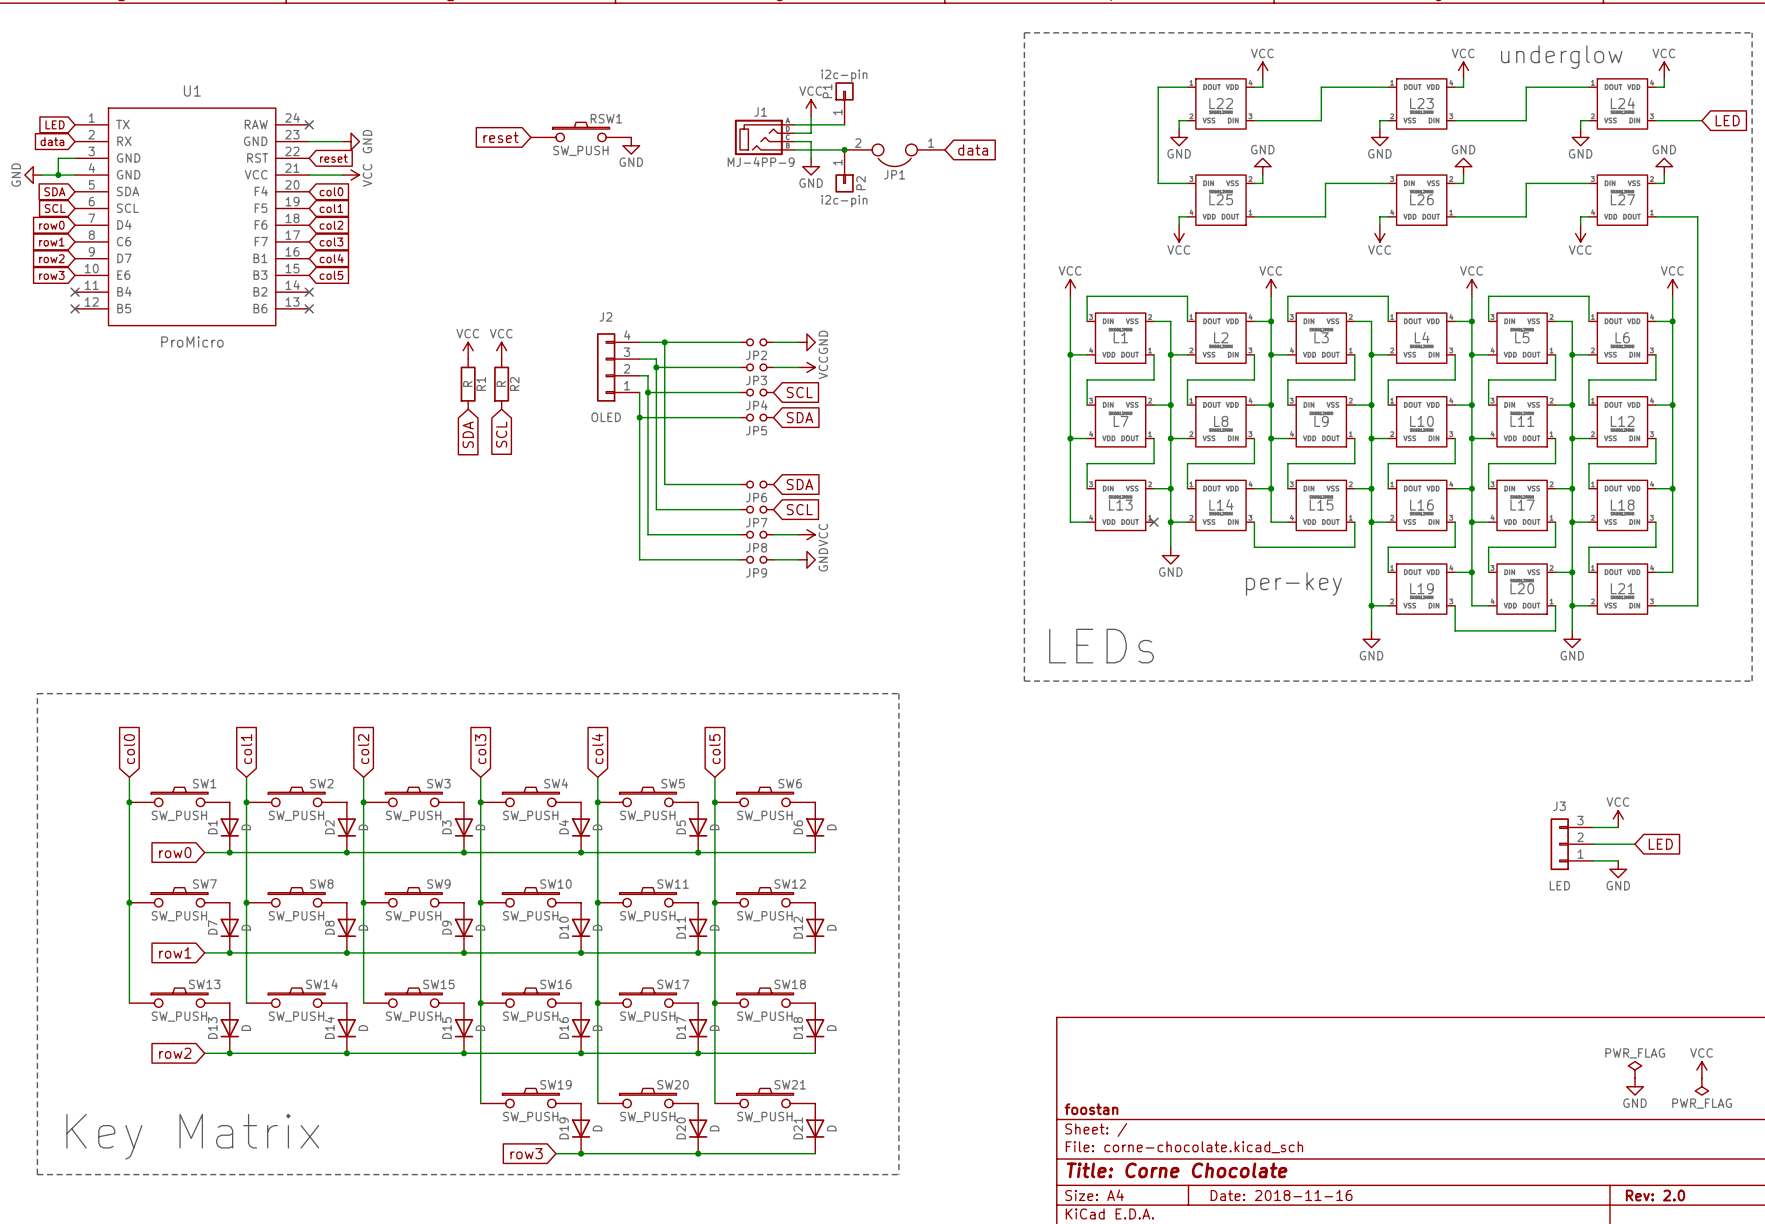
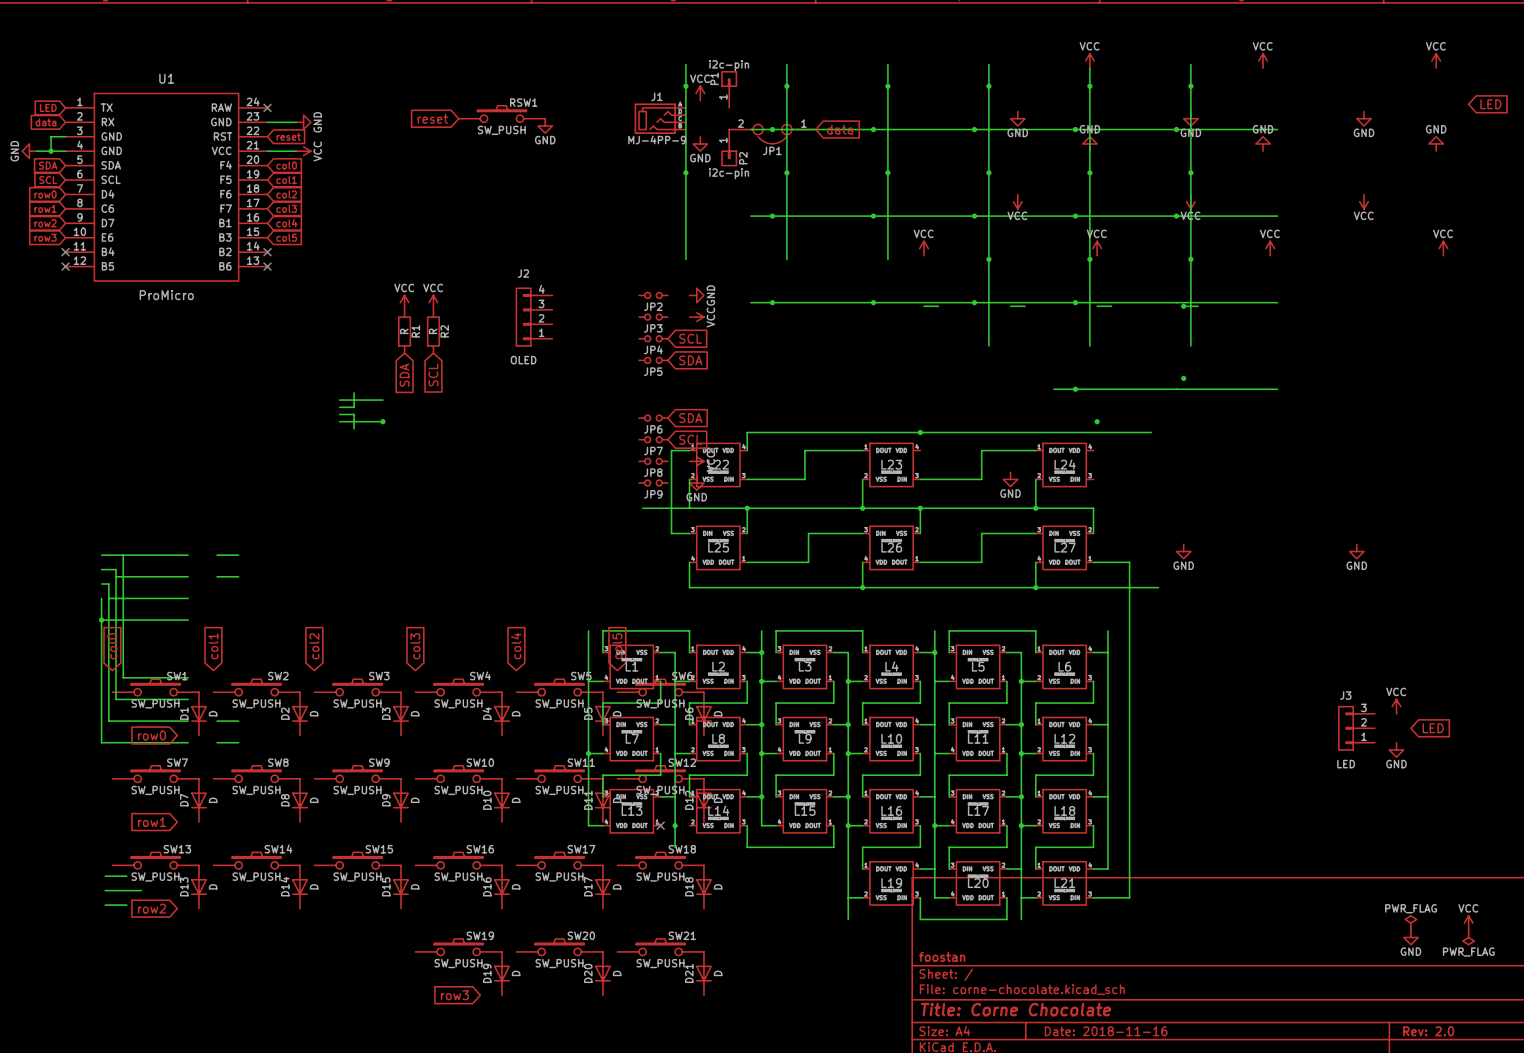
line: (1024, 32) (1752, 32) (1752, 681) (1024, 681) (1024, 32) -> none
text: underglow (1561, 57) -> none
wire: none -> (685, 64) (685, 259)
wire: none -> (786, 64) (786, 259)
wire: none -> (887, 64) (887, 259)
wire: none -> (988, 64) (988, 345)
wire: (1463, 78) (1463, 87) (1455, 87) -> none
wire: (1664, 78) (1664, 87) (1655, 87) -> none
wire: (1187, 87) (1158, 87) (1158, 183) (1187, 183) -> none
wire: (1254, 87) (1262, 87) -> (1089, 151) (1089, 75)
wire: (1388, 87) (1321, 87) (1321, 120) (1254, 120) -> none
wire: (1588, 87) (1526, 87) (1526, 120) (1455, 120) -> none
junction: none -> (685, 86)
junction: none -> (786, 86)
junction: none -> (887, 86)
junction: none -> (988, 86)
junction: none -> (1089, 86)
junction: none -> (1190, 86)
L22 position: (1220, 103) -> (718, 464)
L23 position: (1421, 103) -> (891, 464)
L24 position: (1622, 103) -> (1064, 464)
wire: (811, 116) (811, 133) (794, 133) -> none
wire: (1187, 120) (1179, 120) (1179, 129) -> none
wire: (1379, 120) (1388, 120) -> (1190, 104) (1190, 64)
wire: (1588, 120) (1580, 120) (1580, 129) -> none
wire: (1655, 120) (1701, 120) -> none
wire: (794, 124) (844, 124) -> none
wire: (794, 141) (811, 141) (811, 158) -> none
wire: (794, 149) (844, 149) -> none
junction: (844, 149) -> none
wire: none -> (750, 129) (1277, 129)
junction: none -> (772, 129)
junction: none -> (873, 129)
junction: none -> (974, 129)
junction: none -> (1075, 129)
junction: none -> (1176, 129)
wire: (1463, 175) (1463, 183) (1455, 183) -> none
wire: (1664, 175) (1664, 183) (1655, 183) -> none
wire: (1254, 183) (1262, 183) -> (1089, 345) (1089, 158)
wire: (1388, 183) (1325, 183) (1325, 216) (1254, 216) -> none
wire: (1588, 183) (1526, 183) (1526, 216) (1455, 216) -> none
junction: none -> (685, 172)
junction: none -> (786, 172)
junction: none -> (887, 172)
junction: none -> (988, 172)
L25 position: (1220, 200) -> (718, 547)
junction: none -> (1089, 172)
junction: none -> (1190, 172)
L26 position: (1421, 200) -> (891, 547)
L27 position: (1622, 200) -> (1064, 547)
wire: (1187, 216) (1179, 216) (1179, 225) -> none
wire: (1379, 216) (1388, 216) -> (1190, 187) (1190, 111)
wire: (1588, 216) (1580, 216) (1580, 225) -> none
wire: (1655, 216) (1697, 216) (1697, 605) (1655, 605) -> none
wire: none -> (1190, 194) (1190, 345)
wire: none -> (750, 216) (1277, 216)
junction: none -> (772, 216)
junction: none -> (873, 216)
junction: none -> (974, 216)
junction: none -> (1075, 216)
junction: none -> (1176, 216)
wire: (1070, 296) (1070, 522) (1087, 522) -> none
wire: (1271, 296) (1271, 522) (1287, 522) -> none
wire: (1471, 296) (1471, 605) (1488, 605) -> none
wire: (1672, 296) (1672, 572) (1655, 572) -> none
junction: none -> (988, 259)
junction: none -> (1089, 259)
junction: none -> (1190, 259)
wire: (1087, 321) (1087, 296) (1187, 296) (1187, 321) -> none
wire: (1154, 321) (1170, 321) (1170, 547) -> none
wire: (1254, 321) (1271, 321) -> none
junction: (1271, 321) -> none
wire: (1287, 321) (1287, 296) (1388, 296) (1388, 321) -> none
wire: (1354, 321) (1371, 321) (1371, 630) -> none
wire: (1455, 321) (1471, 321) -> none
junction: (1471, 321) -> none
wire: (1488, 321) (1488, 296) (1588, 296) (1588, 321) -> none
wire: (1555, 321) (1572, 321) (1572, 630) -> none
wire: (1655, 321) (1672, 321) -> none
junction: (1672, 321) -> none
L1 position: (1120, 338) -> (631, 666)
L2 position: (1220, 338) -> (718, 666)
L3 position: (1321, 338) -> (804, 666)
L4 position: (1421, 338) -> (891, 666)
L5 position: (1522, 338) -> (978, 666)
L6 position: (1622, 338) -> (1064, 666)
wire: (639, 342) (740, 342) -> none
wire: (664, 342) (664, 484) (740, 484) -> none
junction: (664, 342) -> none
wire: (773, 342) (798, 342) -> none
wire: none -> (750, 302) (1277, 302)
junction: none -> (772, 302)
junction: none -> (873, 302)
junction: none -> (974, 302)
junction: none -> (1075, 302)
junction: (1070, 354) -> none
wire: (1154, 354) (1154, 379) (1087, 379) (1087, 405) -> none
junction: (1170, 354) -> none
wire: (1254, 354) (1254, 379) (1187, 379) (1187, 405) -> none
junction: (1271, 354) -> none
wire: (1354, 354) (1354, 379) (1287, 379) (1287, 405) -> none
wire: (1455, 354) (1455, 379) (1388, 379) (1388, 405) -> none
wire: (1471, 354) (1488, 354) -> none
junction: (1471, 354) -> none
wire: (1555, 354) (1555, 379) (1488, 379) (1488, 405) -> none
wire: (1572, 354) (1588, 354) -> none
junction: (1572, 354) -> none
wire: (1655, 354) (1655, 379) (1588, 379) (1588, 405) -> none
wire: (639, 359) (656, 359) (656, 509) (740, 509) -> none
wire: (656, 367) (740, 367) -> none
junction: (656, 367) -> none
wire: (773, 367) (798, 367) -> none
wire: (639, 375) (648, 375) (648, 534) (740, 534) -> none
wire: (639, 392) (639, 559) (740, 559) -> none
wire: (648, 392) (740, 392) -> none
junction: (648, 392) -> none
wire: (1154, 405) (1170, 405) -> none
junction: (1170, 405) -> none
wire: (1254, 405) (1271, 405) -> none
junction: (1271, 405) -> none
wire: (1354, 405) (1371, 405) -> none
junction: (1371, 405) -> none
wire: (1455, 405) (1471, 405) -> none
junction: (1471, 405) -> none
wire: (1555, 405) (1572, 405) -> none
junction: (1572, 405) -> none
wire: (1655, 405) (1672, 405) -> none
junction: (1672, 405) -> none
wire: (639, 417) (740, 417) -> none
junction: (639, 417) -> none
L7 position: (1120, 421) -> (631, 739)
L8 position: (1220, 421) -> (718, 739)
L9 position: (1321, 421) -> (804, 739)
L10 position: (1421, 421) -> (891, 739)
L11 position: (1522, 421) -> (978, 739)
L12 position: (1622, 421) -> (1064, 739)
wire: (1070, 438) (1087, 438) -> none
junction: (1070, 438) -> none
wire: (1154, 438) (1154, 463) (1087, 463) (1087, 488) -> none
wire: (1170, 438) (1187, 438) -> none
junction: (1170, 438) -> none
wire: (1254, 438) (1254, 463) (1187, 463) (1187, 488) -> none
wire: (1271, 438) (1287, 438) -> none
junction: (1271, 438) -> none
wire: (1354, 438) (1354, 463) (1287, 463) (1287, 488) -> none
wire: (1371, 438) (1388, 438) -> none
wire: (1455, 438) (1455, 463) (1388, 463) (1388, 488) -> none
wire: (1471, 438) (1488, 438) -> none
junction: (1471, 438) -> none
wire: (1555, 438) (1555, 463) (1488, 463) (1488, 488) -> none
wire: (1572, 438) (1588, 438) -> none
junction: (1572, 438) -> none
wire: (1655, 438) (1655, 463) (1588, 463) (1588, 488) -> none
wire: none -> (1053, 389) (1277, 389)
junction: none -> (1075, 389)
wire: none -> (354, 392) (354, 407) (339, 407)
wire: none -> (339, 400) (382, 400)
wire: none -> (339, 414) (354, 414) (354, 428)
wire: none -> (339, 421) (382, 421)
junction: none -> (382, 421)
wire: (1154, 488) (1170, 488) -> none
junction: (1170, 488) -> none
wire: (1254, 488) (1271, 488) -> none
wire: (1354, 488) (1371, 488) -> none
junction: (1371, 488) -> none
wire: (1455, 488) (1471, 488) -> none
junction: (1471, 488) -> none
wire: (1555, 488) (1572, 488) -> none
junction: (1572, 488) -> none
wire: (1655, 488) (1672, 488) -> none
junction: (1672, 488) -> none
junction: none -> (920, 432)
wire: none -> (1151, 432) (747, 432) (747, 450)
L13 position: (1120, 505) -> (631, 811)
L14 position: (1220, 505) -> (718, 811)
L15 position: (1321, 505) -> (804, 811)
L16 position: (1421, 505) -> (891, 811)
L17 position: (1522, 505) -> (978, 811)
L18 position: (1622, 505) -> (1064, 811)
wire: none -> (689, 450) (671, 450) (671, 533) (689, 533)
wire: none -> (862, 450) (804, 450) (804, 479) (747, 479)
no-connect mark: (1154, 522) -> none
wire: none -> (1010, 450) (981, 450) (981, 479) (920, 479)
junction: (1170, 522) -> none
wire: (1254, 522) (1254, 547) (1354, 547) (1354, 522) -> none
wire: (1371, 522) (1388, 522) -> none
junction: (1371, 522) -> none
wire: (1455, 522) (1455, 547) (1388, 547) (1388, 572) -> none
wire: (1471, 522) (1488, 522) -> none
junction: (1471, 522) -> none
wire: (1555, 522) (1555, 547) (1488, 547) (1488, 572) -> none
wire: (1572, 522) (1588, 522) -> none
junction: (1572, 522) -> none
wire: (1655, 522) (1655, 547) (1588, 547) (1588, 572) -> none
wire: (773, 534) (798, 534) -> none
wire: none -> (689, 479) (689, 508)
wire: none -> (862, 479) (862, 508)
wire: none -> (1035, 479) (1035, 508)
wire: (773, 559) (798, 559) -> none
power symbol rotation: 0° (806, 559) -> 90° clockwise (696, 483)
wire: (1455, 572) (1471, 572) -> none
junction: (1471, 572) -> none
wire: (1555, 572) (1572, 572) -> none
junction: (1572, 572) -> none
text: per-key (1293, 583) -> none
wire: none -> (642, 508) (1093, 508) (1093, 533)
wire: none -> (747, 508) (747, 533)
junction: none -> (747, 508)
junction: none -> (862, 508)
wire: none -> (920, 508) (920, 533)
junction: none -> (920, 508)
junction: none -> (1035, 508)
L19 position: (1421, 589) -> (891, 883)
L20 position: (1522, 589) -> (978, 883)
L21 position: (1622, 589) -> (1064, 883)
wire: (1371, 605) (1388, 605) -> none
junction: (1371, 605) -> none
wire: (1455, 605) (1455, 630) (1555, 630) (1555, 605) -> none
wire: (1572, 605) (1588, 605) -> none
junction: (1572, 605) -> none
wire: none -> (862, 533) (808, 533) (808, 562) (747, 562)
wire: none -> (1035, 533) (981, 533) (981, 562) (920, 562)
wire: none -> (101, 555) (188, 555)
wire: none -> (123, 555) (123, 677) (188, 677)
wire: none -> (217, 555) (238, 555)
text: LEDs (1101, 646) -> none
wire: none -> (689, 562) (689, 587) (1158, 587)
wire: none -> (862, 562) (862, 587)
wire: none -> (1035, 562) (1035, 587)
wire: none -> (1093, 562) (1129, 562) (1129, 897) (1093, 897)
wire: none -> (101, 569) (116, 569) (116, 699) (188, 699)
wire: none -> (116, 576) (188, 576)
wire: none -> (217, 576) (238, 576)
wire: none -> (101, 584) (108, 584) (108, 721) (188, 721)
junction: none -> (862, 587)
junction: none -> (1035, 587)
line: (37, 693) (37, 1174) (898, 1174) (898, 693) (37, 693) -> none
wire: none -> (101, 598) (101, 742) (188, 742)
wire: none -> (101, 620) (188, 620)
junction: none -> (101, 620)
wire: none -> (588, 630) (588, 825) (602, 825)
wire: none -> (761, 630) (761, 825) (776, 825)
wire: none -> (934, 630) (934, 897) (949, 897)
wire: none -> (1107, 630) (1107, 868) (1093, 868)
wire: none -> (602, 652) (602, 630) (689, 630) (689, 652)
wire: none -> (660, 652) (675, 652) (675, 847)
wire: none -> (747, 652) (761, 652)
junction: none -> (761, 652)
wire: none -> (776, 652) (776, 630) (862, 630) (862, 652)
wire: none -> (833, 652) (848, 652) (848, 919)
wire: none -> (920, 652) (934, 652)
junction: none -> (934, 652)
wire: none -> (949, 652) (949, 630) (1035, 630) (1035, 652)
wire: none -> (1006, 652) (1021, 652) (1021, 919)
wire: none -> (1093, 652) (1107, 652)
wire: (129, 777) (129, 1003) -> none
wire: (246, 777) (246, 1003) -> none
wire: (363, 777) (363, 1003) -> none
wire: (480, 777) (480, 1103) -> none
wire: (597, 777) (597, 1103) -> none
wire: (714, 777) (714, 1103) -> none
wire: none -> (588, 681) (602, 681)
wire: none -> (660, 681) (660, 703) (602, 703) (602, 724)
wire: none -> (675, 681) (689, 681)
wire: none -> (747, 681) (747, 703) (689, 703) (689, 724)
wire: none -> (761, 681) (776, 681)
junction: none -> (761, 681)
wire: none -> (833, 681) (833, 703) (776, 703) (776, 724)
wire: none -> (848, 681) (862, 681)
junction: none -> (848, 681)
wire: none -> (920, 681) (920, 703) (862, 703) (862, 724)
wire: none -> (934, 681) (949, 681)
wire: none -> (1006, 681) (1006, 703) (949, 703) (949, 724)
wire: none -> (1021, 681) (1035, 681)
junction: none -> (1021, 681)
wire: none -> (1093, 681) (1093, 703) (1035, 703) (1035, 724)
junction: (129, 802) -> none
junction: (246, 802) -> none
junction: (363, 802) -> none
junction: (480, 802) -> none
junction: (597, 802) -> none
junction: (714, 802) -> none
wire: (1593, 827) (1618, 827) -> none
wire: none -> (217, 721) (238, 721)
wire: none -> (660, 724) (675, 724)
wire: none -> (747, 724) (761, 724)
junction: none -> (761, 724)
wire: none -> (833, 724) (848, 724)
junction: none -> (848, 724)
wire: none -> (920, 724) (934, 724)
wire: none -> (1006, 724) (1021, 724)
junction: none -> (1021, 724)
wire: none -> (1093, 724) (1107, 724)
wire: (1593, 844) (1634, 844) -> none
wire: (204, 852) (815, 852) -> none
junction: (229, 852) -> none
junction: (346, 852) -> none
junction: (463, 852) -> none
junction: (581, 852) -> none
junction: (698, 852) -> none
wire: none -> (217, 742) (238, 742)
wire: (1593, 860) (1618, 860) -> none
wire: none -> (588, 753) (602, 753)
junction: none -> (588, 753)
wire: none -> (660, 753) (660, 775) (602, 775) (602, 796)
wire: none -> (675, 753) (689, 753)
wire: none -> (747, 753) (747, 775) (689, 775) (689, 796)
wire: none -> (761, 753) (776, 753)
junction: none -> (761, 753)
wire: none -> (833, 753) (833, 775) (776, 775) (776, 796)
wire: none -> (848, 753) (862, 753)
junction: none -> (848, 753)
wire: none -> (920, 753) (920, 775) (862, 775) (862, 796)
wire: none -> (934, 753) (949, 753)
wire: none -> (1006, 753) (1006, 775) (949, 775) (949, 796)
wire: none -> (1021, 753) (1035, 753)
junction: none -> (1021, 753)
wire: none -> (1093, 753) (1093, 775) (1035, 775) (1035, 796)
junction: (129, 902) -> none
junction: (246, 902) -> none
junction: (363, 902) -> none
junction: (480, 902) -> none
junction: (597, 902) -> none
junction: (714, 902) -> none
wire: none -> (660, 796) (675, 796)
wire: none -> (747, 796) (761, 796)
junction: none -> (761, 796)
wire: none -> (833, 796) (848, 796)
junction: none -> (848, 796)
wire: none -> (920, 796) (934, 796)
wire: none -> (1006, 796) (1021, 796)
junction: none -> (1021, 796)
wire: none -> (1093, 796) (1107, 796)
wire: (204, 952) (815, 952) -> none
junction: (229, 952) -> none
junction: (346, 952) -> none
junction: (463, 952) -> none
junction: (581, 952) -> none
junction: (698, 952) -> none
no-connect mark: none -> (660, 825)
junction: none -> (675, 825)
wire: none -> (747, 825) (747, 847) (833, 847) (833, 825)
wire: none -> (848, 825) (862, 825)
junction: none -> (848, 825)
wire: none -> (920, 825) (920, 847) (862, 847) (862, 868)
wire: none -> (934, 825) (949, 825)
junction: none -> (934, 825)
wire: none -> (1006, 825) (1006, 847) (949, 847) (949, 868)
wire: none -> (1021, 825) (1035, 825)
junction: none -> (1021, 825)
wire: none -> (1093, 825) (1093, 847) (1035, 847) (1035, 868)
junction: (480, 1003) -> none
junction: (597, 1003) -> none
junction: (714, 1003) -> none
wire: none -> (920, 868) (934, 868)
wire: none -> (1006, 868) (1021, 868)
wire: none -> (105, 876) (126, 876)
wire: none -> (105, 890) (141, 890)
wire: none -> (848, 897) (862, 897)
wire: none -> (920, 897) (920, 919) (1006, 919) (1006, 897)
wire: none -> (1021, 897) (1035, 897)
wire: none -> (105, 905) (126, 905)
wire: (204, 1053) (815, 1053) -> none
junction: (229, 1053) -> none
junction: (346, 1053) -> none
junction: (463, 1053) -> none
junction: (581, 1053) -> none
junction: (698, 1053) -> none
text: Key Matrix (192, 1136) -> none
wire: (555, 1153) (815, 1153) -> none
junction: (581, 1153) -> none
junction: (698, 1153) -> none

